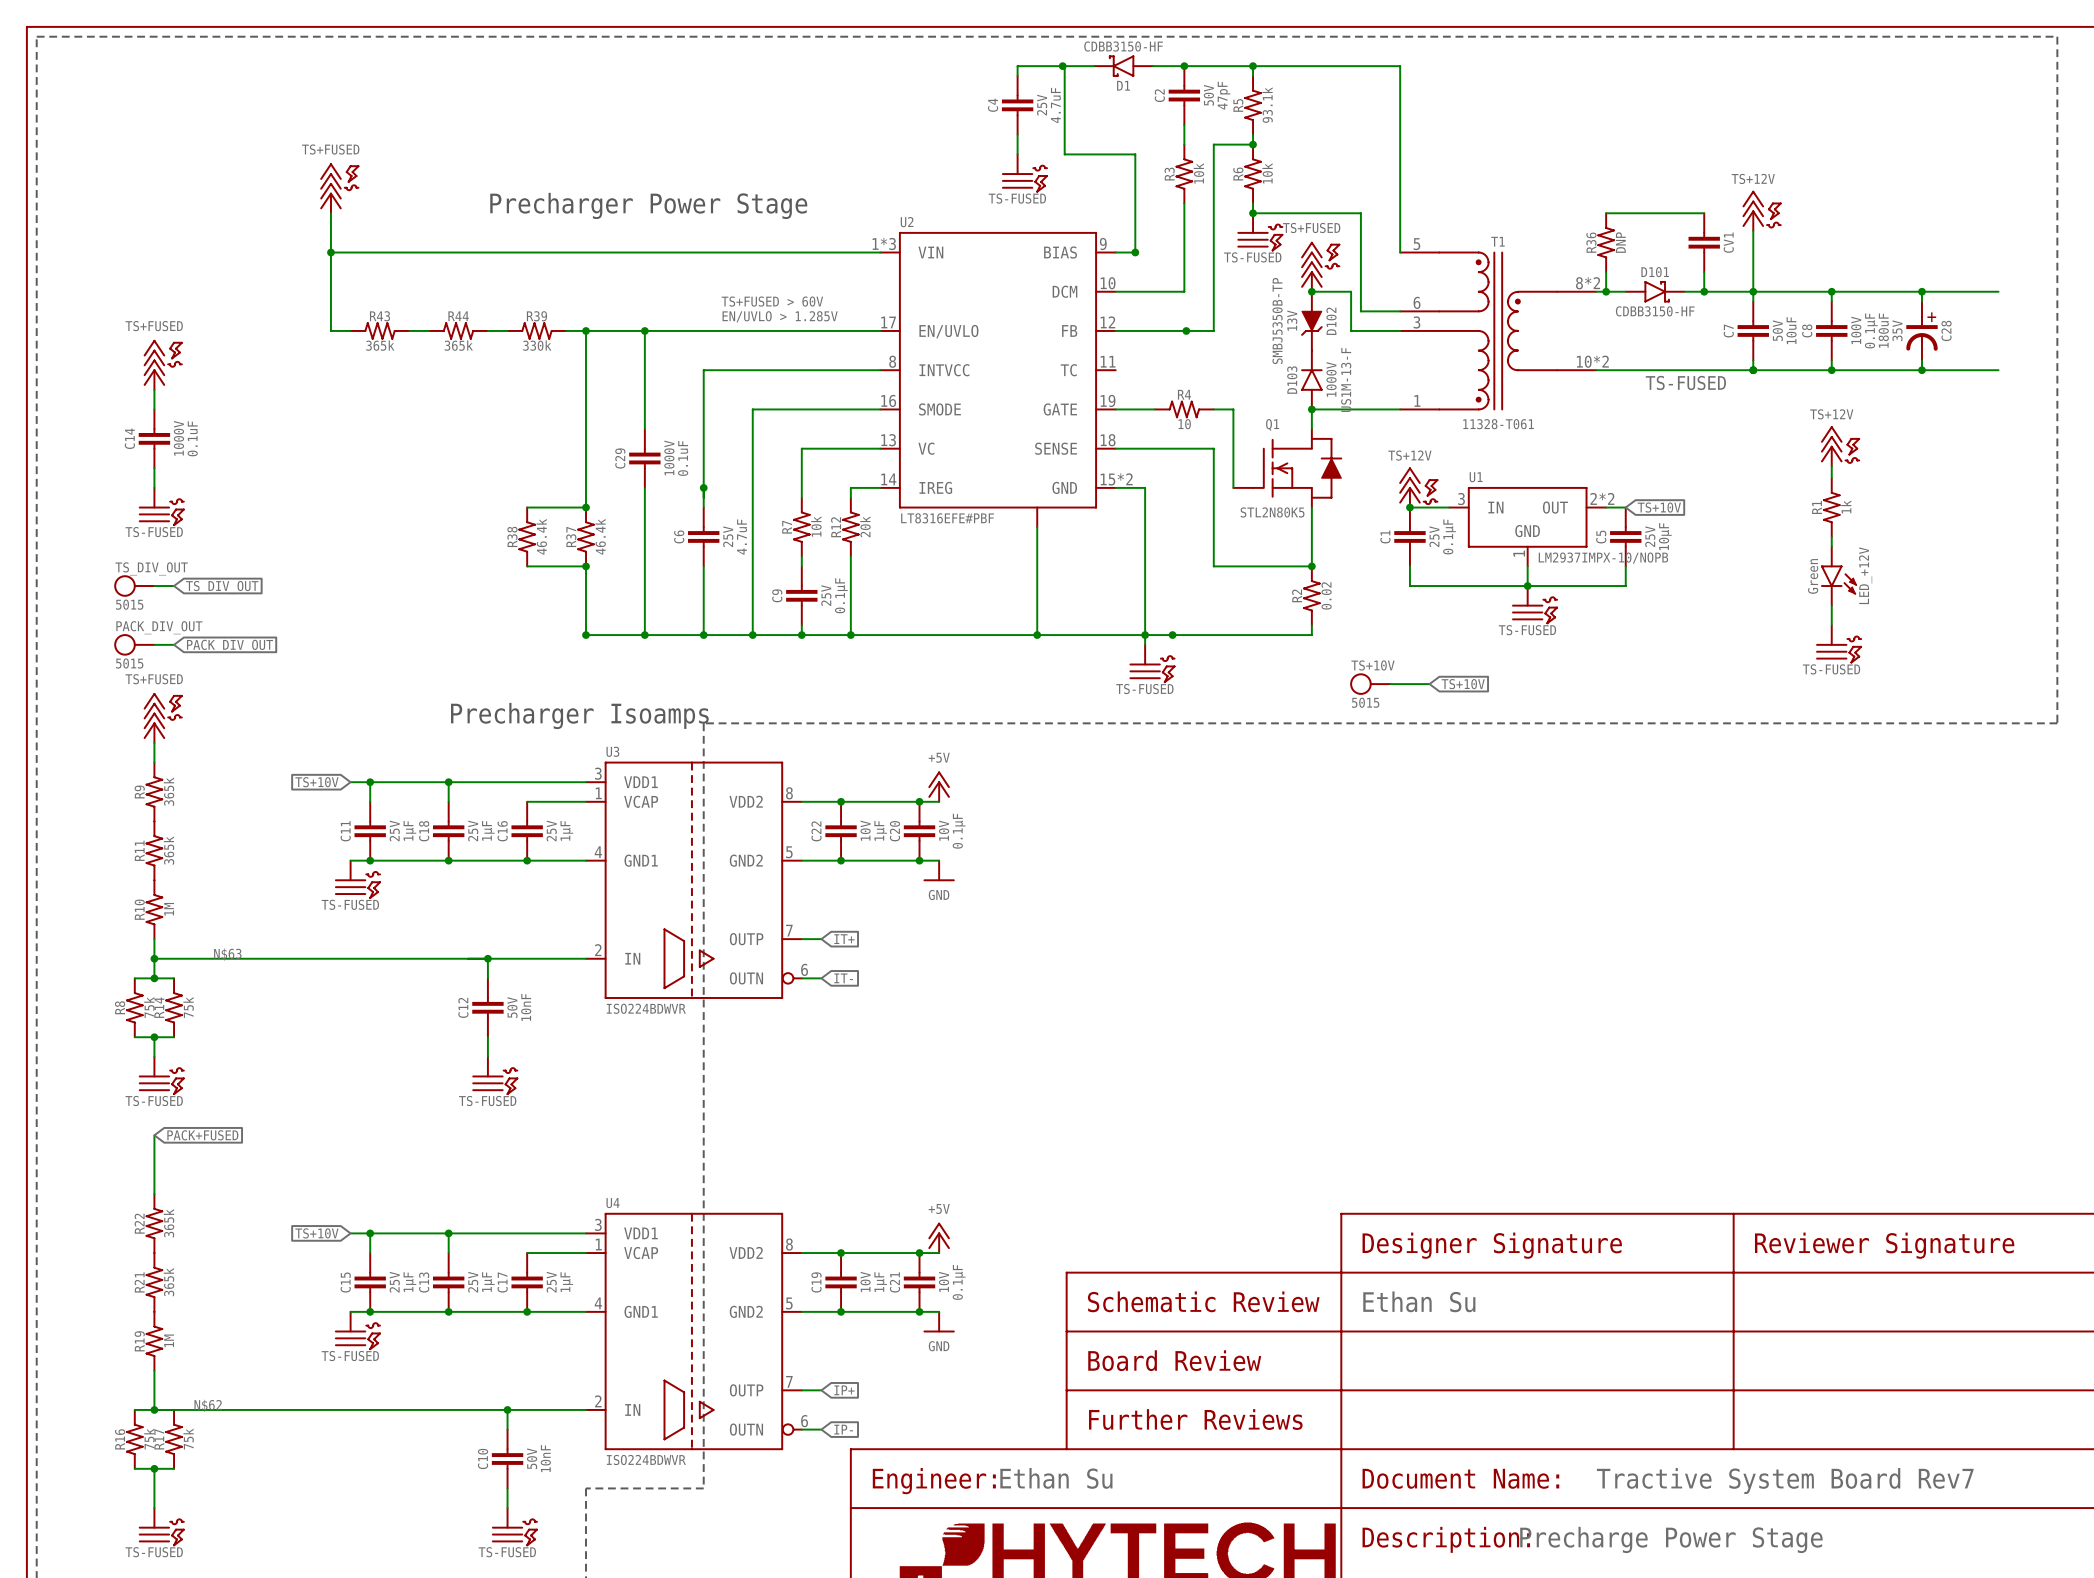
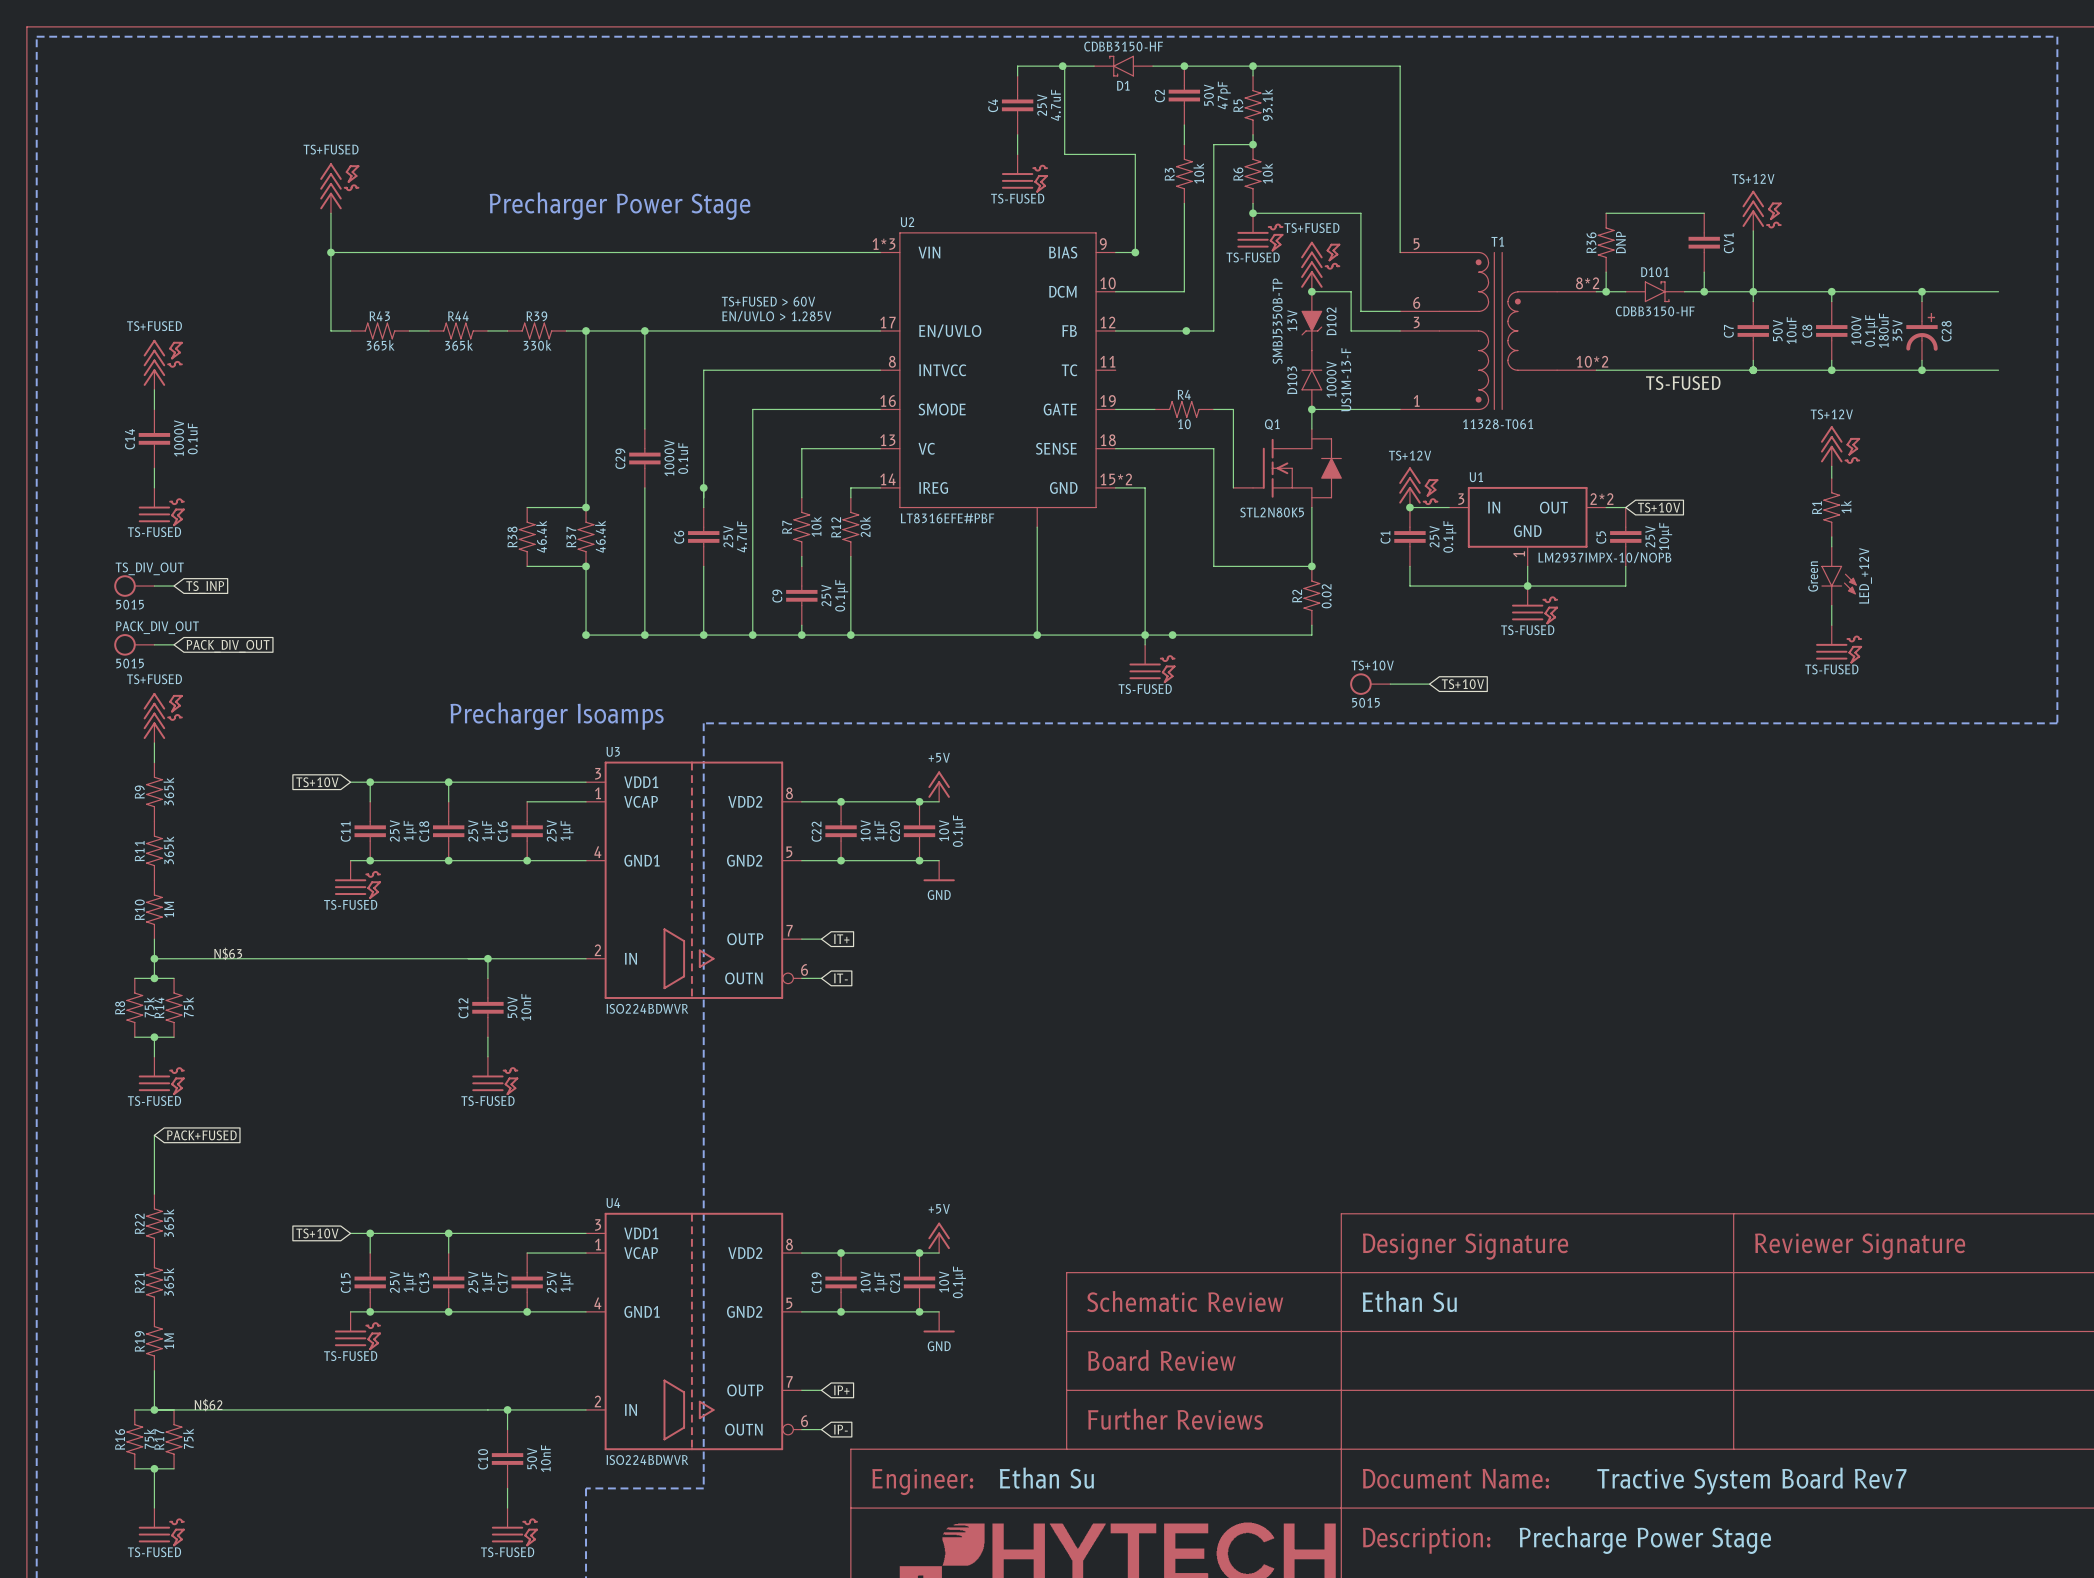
global label: TS_DIV_OUT (222, 587) -> TS_INP (205, 587)

